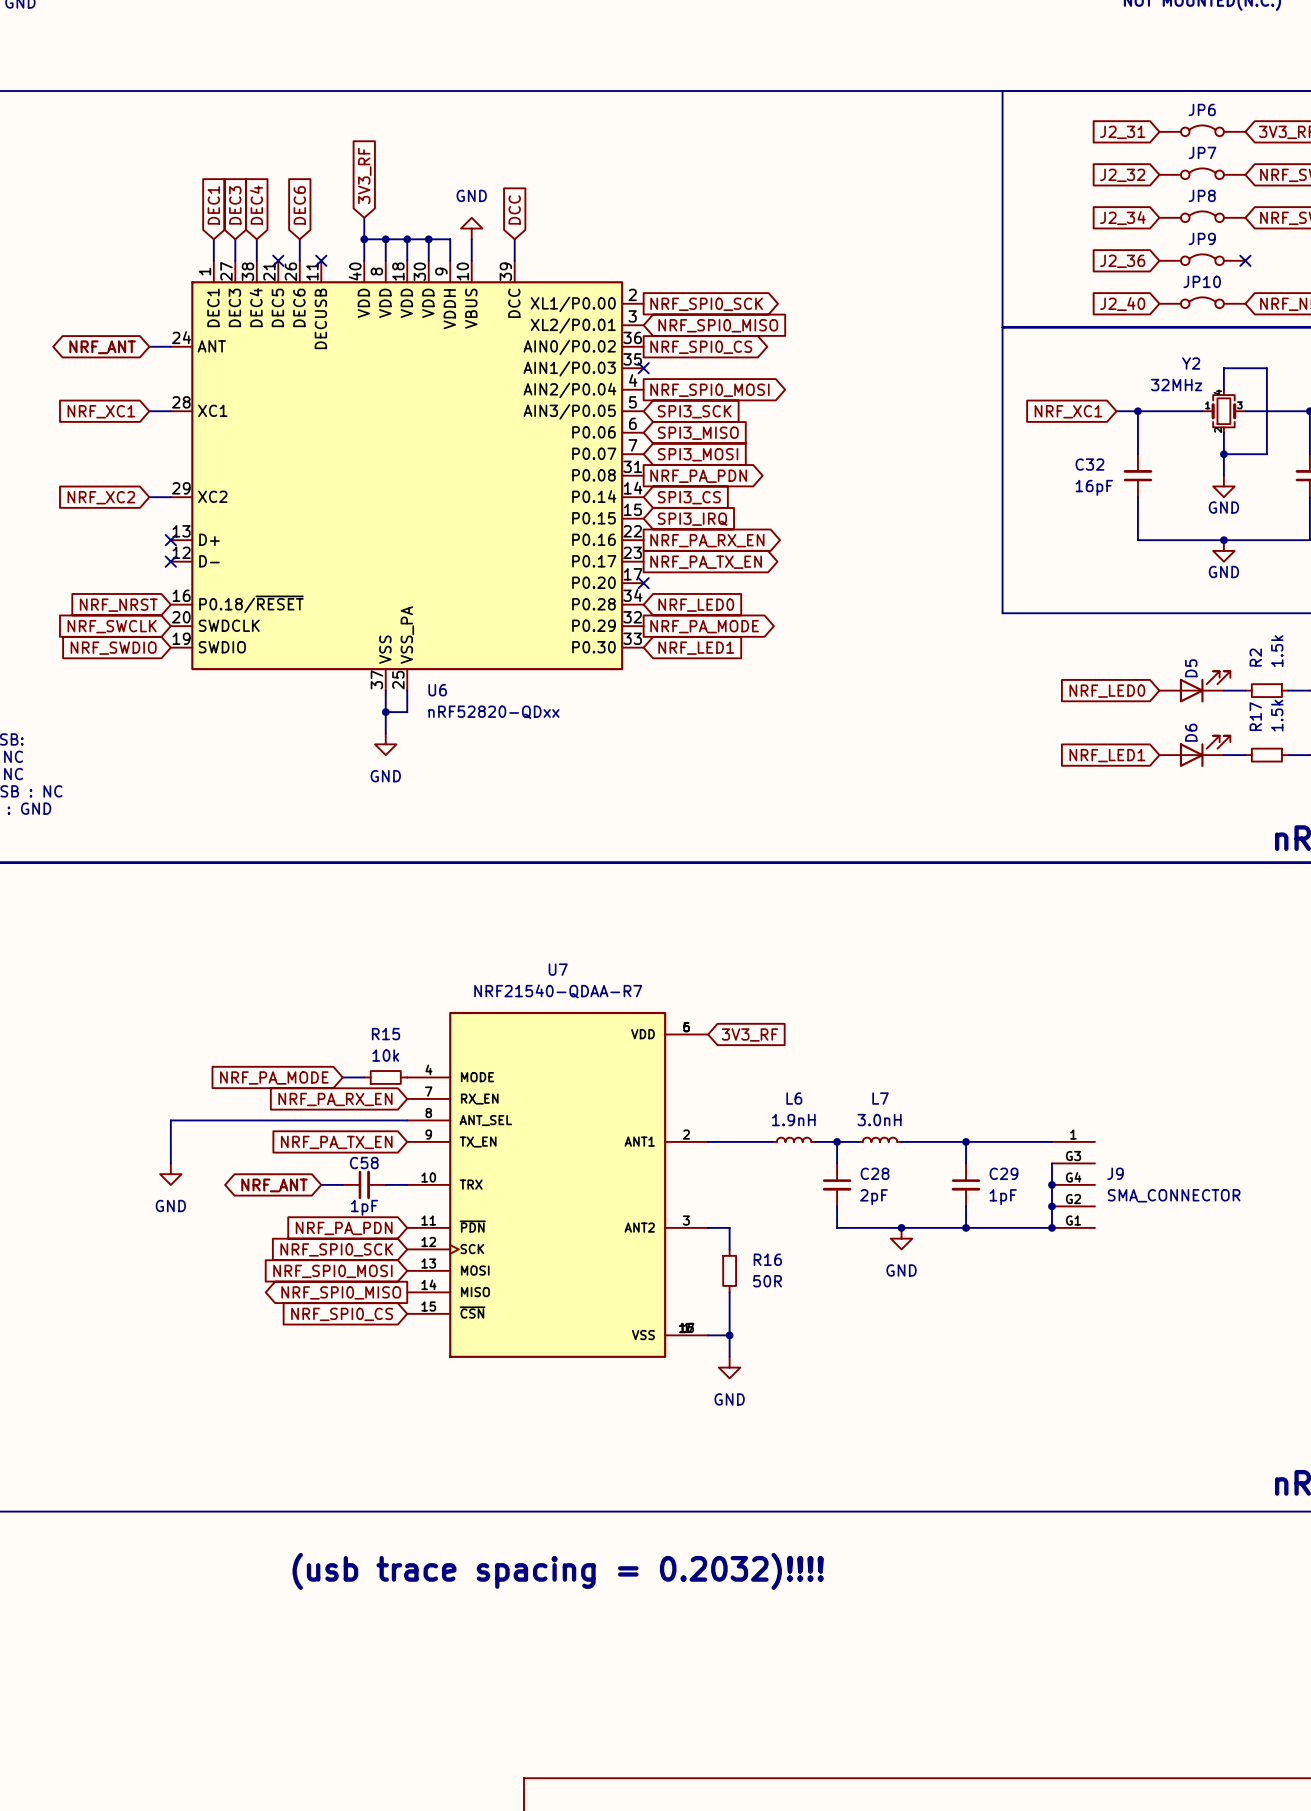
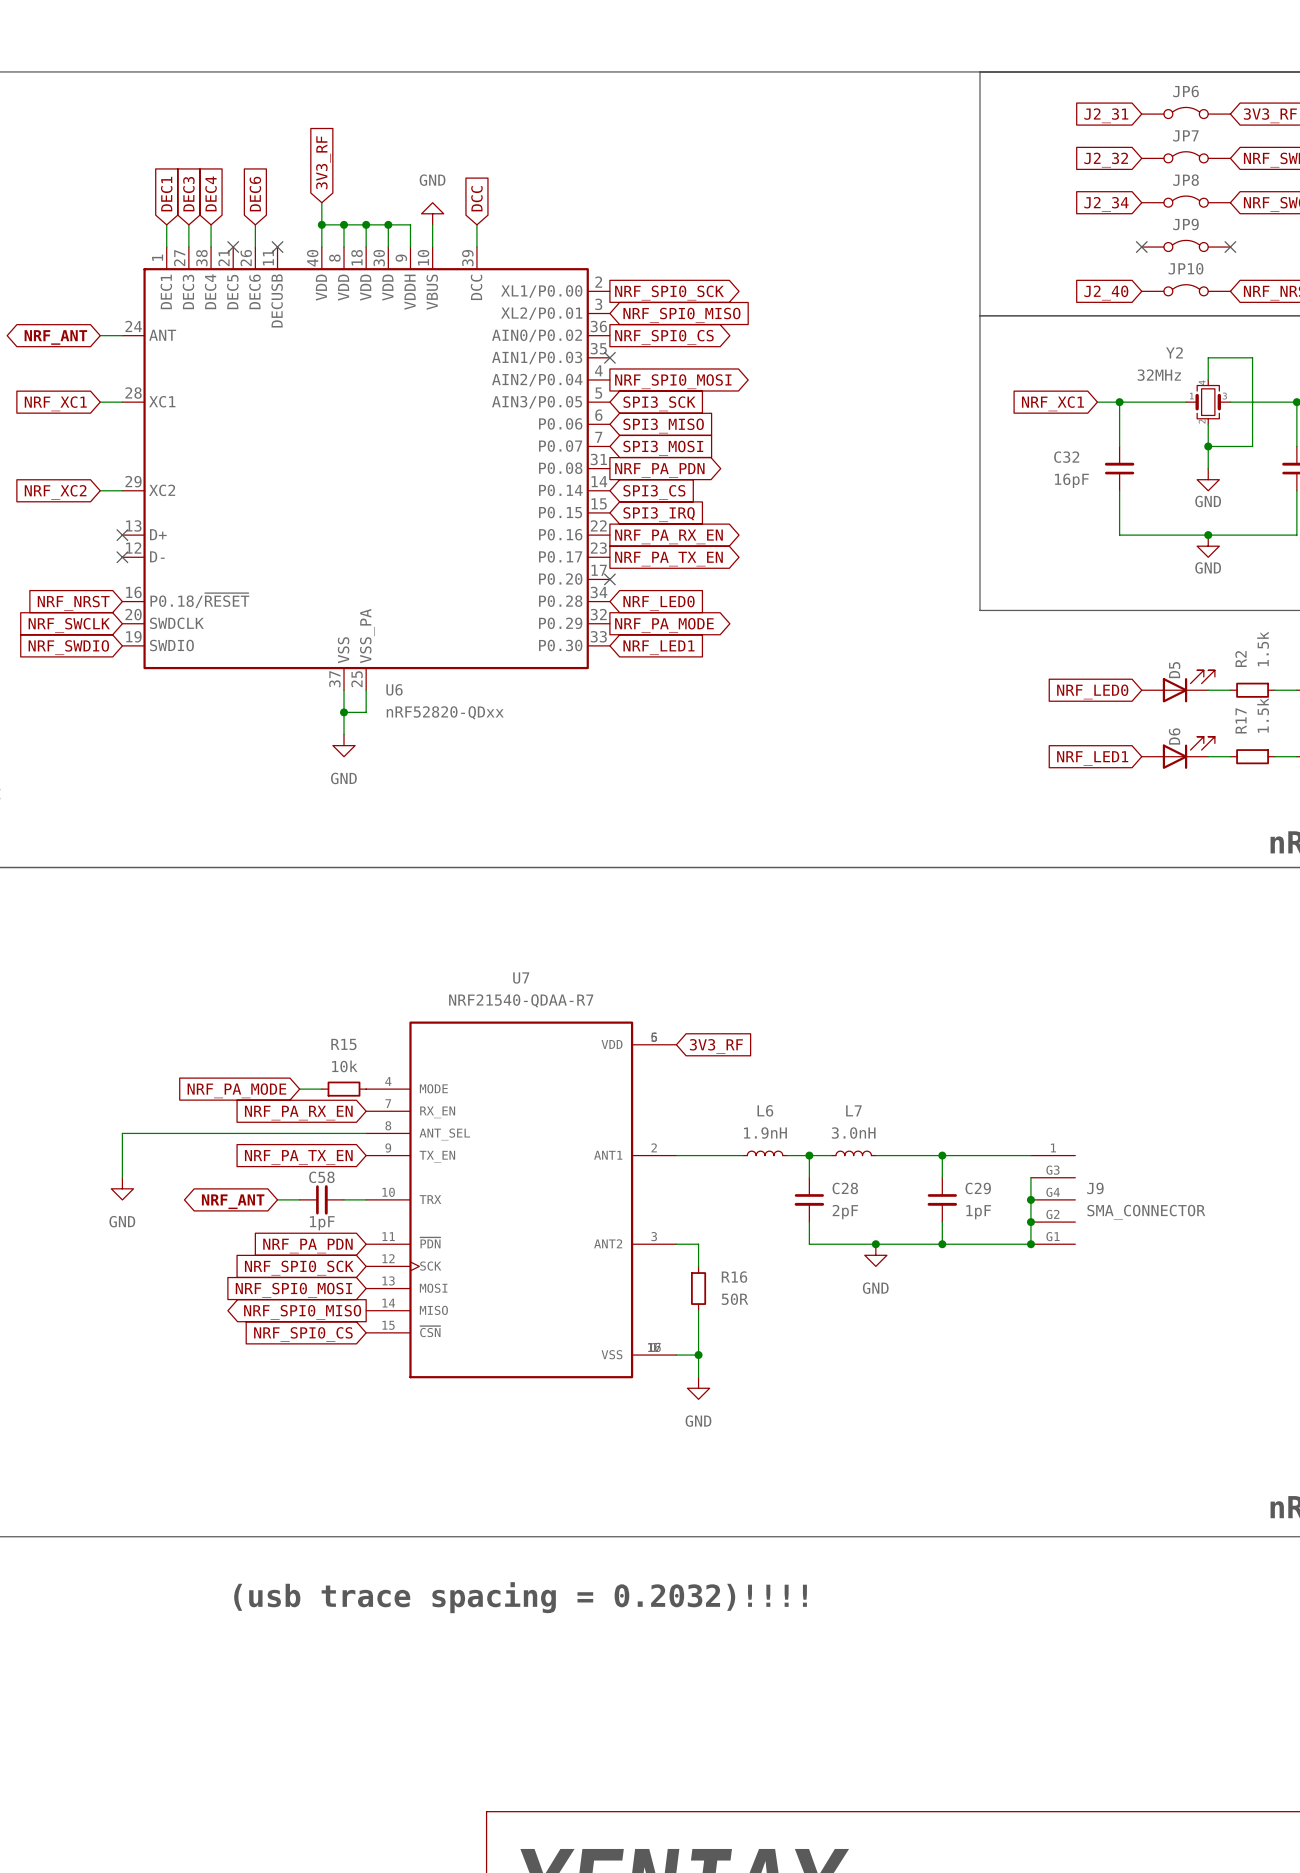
no-connect mark: none -> (1141, 247)
global label: J2_36 (1122, 261) -> none

